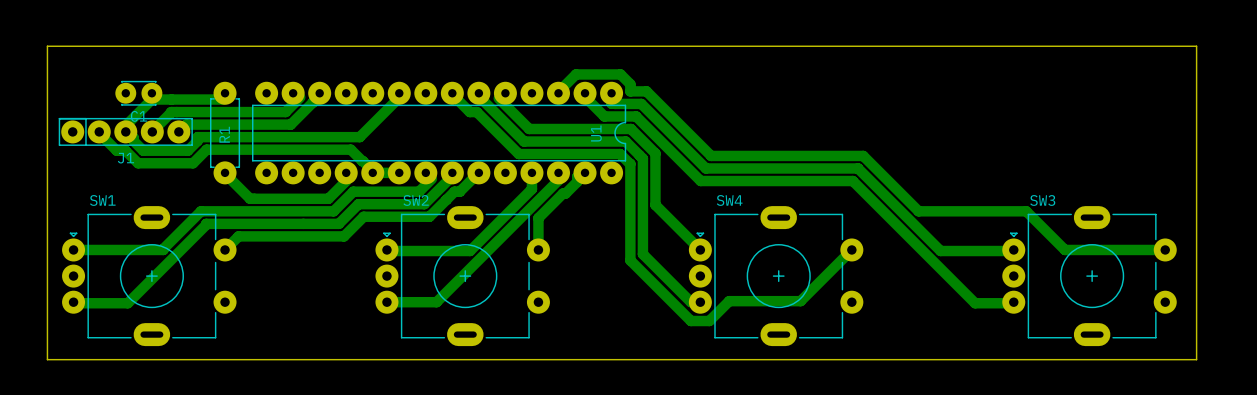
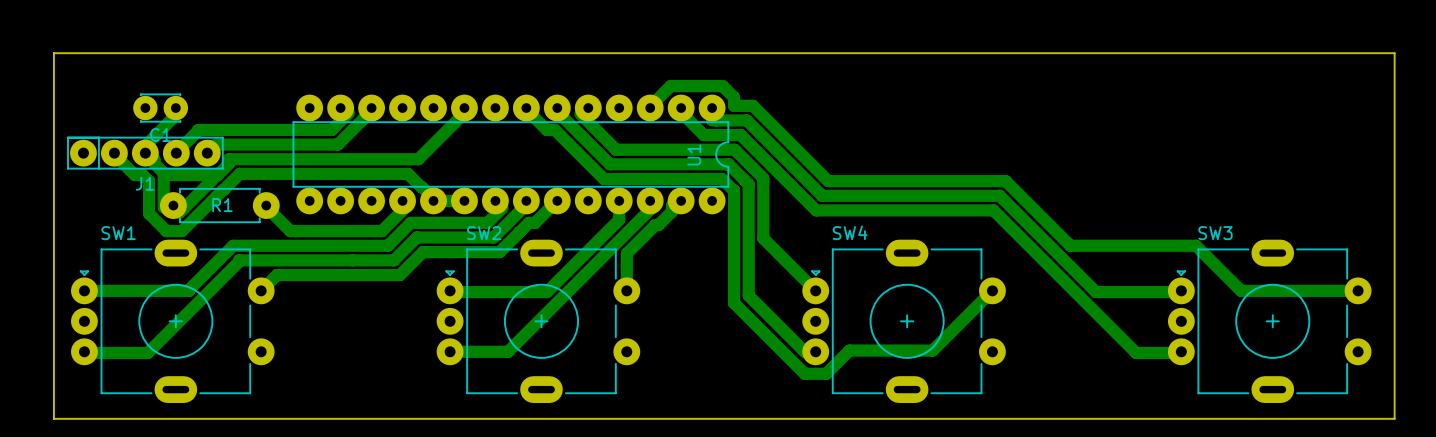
bottom track: (151, 99) (222, 99) -> none
R1 rotation: 0° (225, 133) -> 90° clockwise (219, 205)
bottom track: (123, 150) (138, 163) (192, 163) -> (142, 175) (149, 181) (149, 213) (166, 231) (181, 231) (223, 189)
bottom track: none -> (163, 175) (163, 207)
bottom track: none -> (217, 175) (179, 212)

